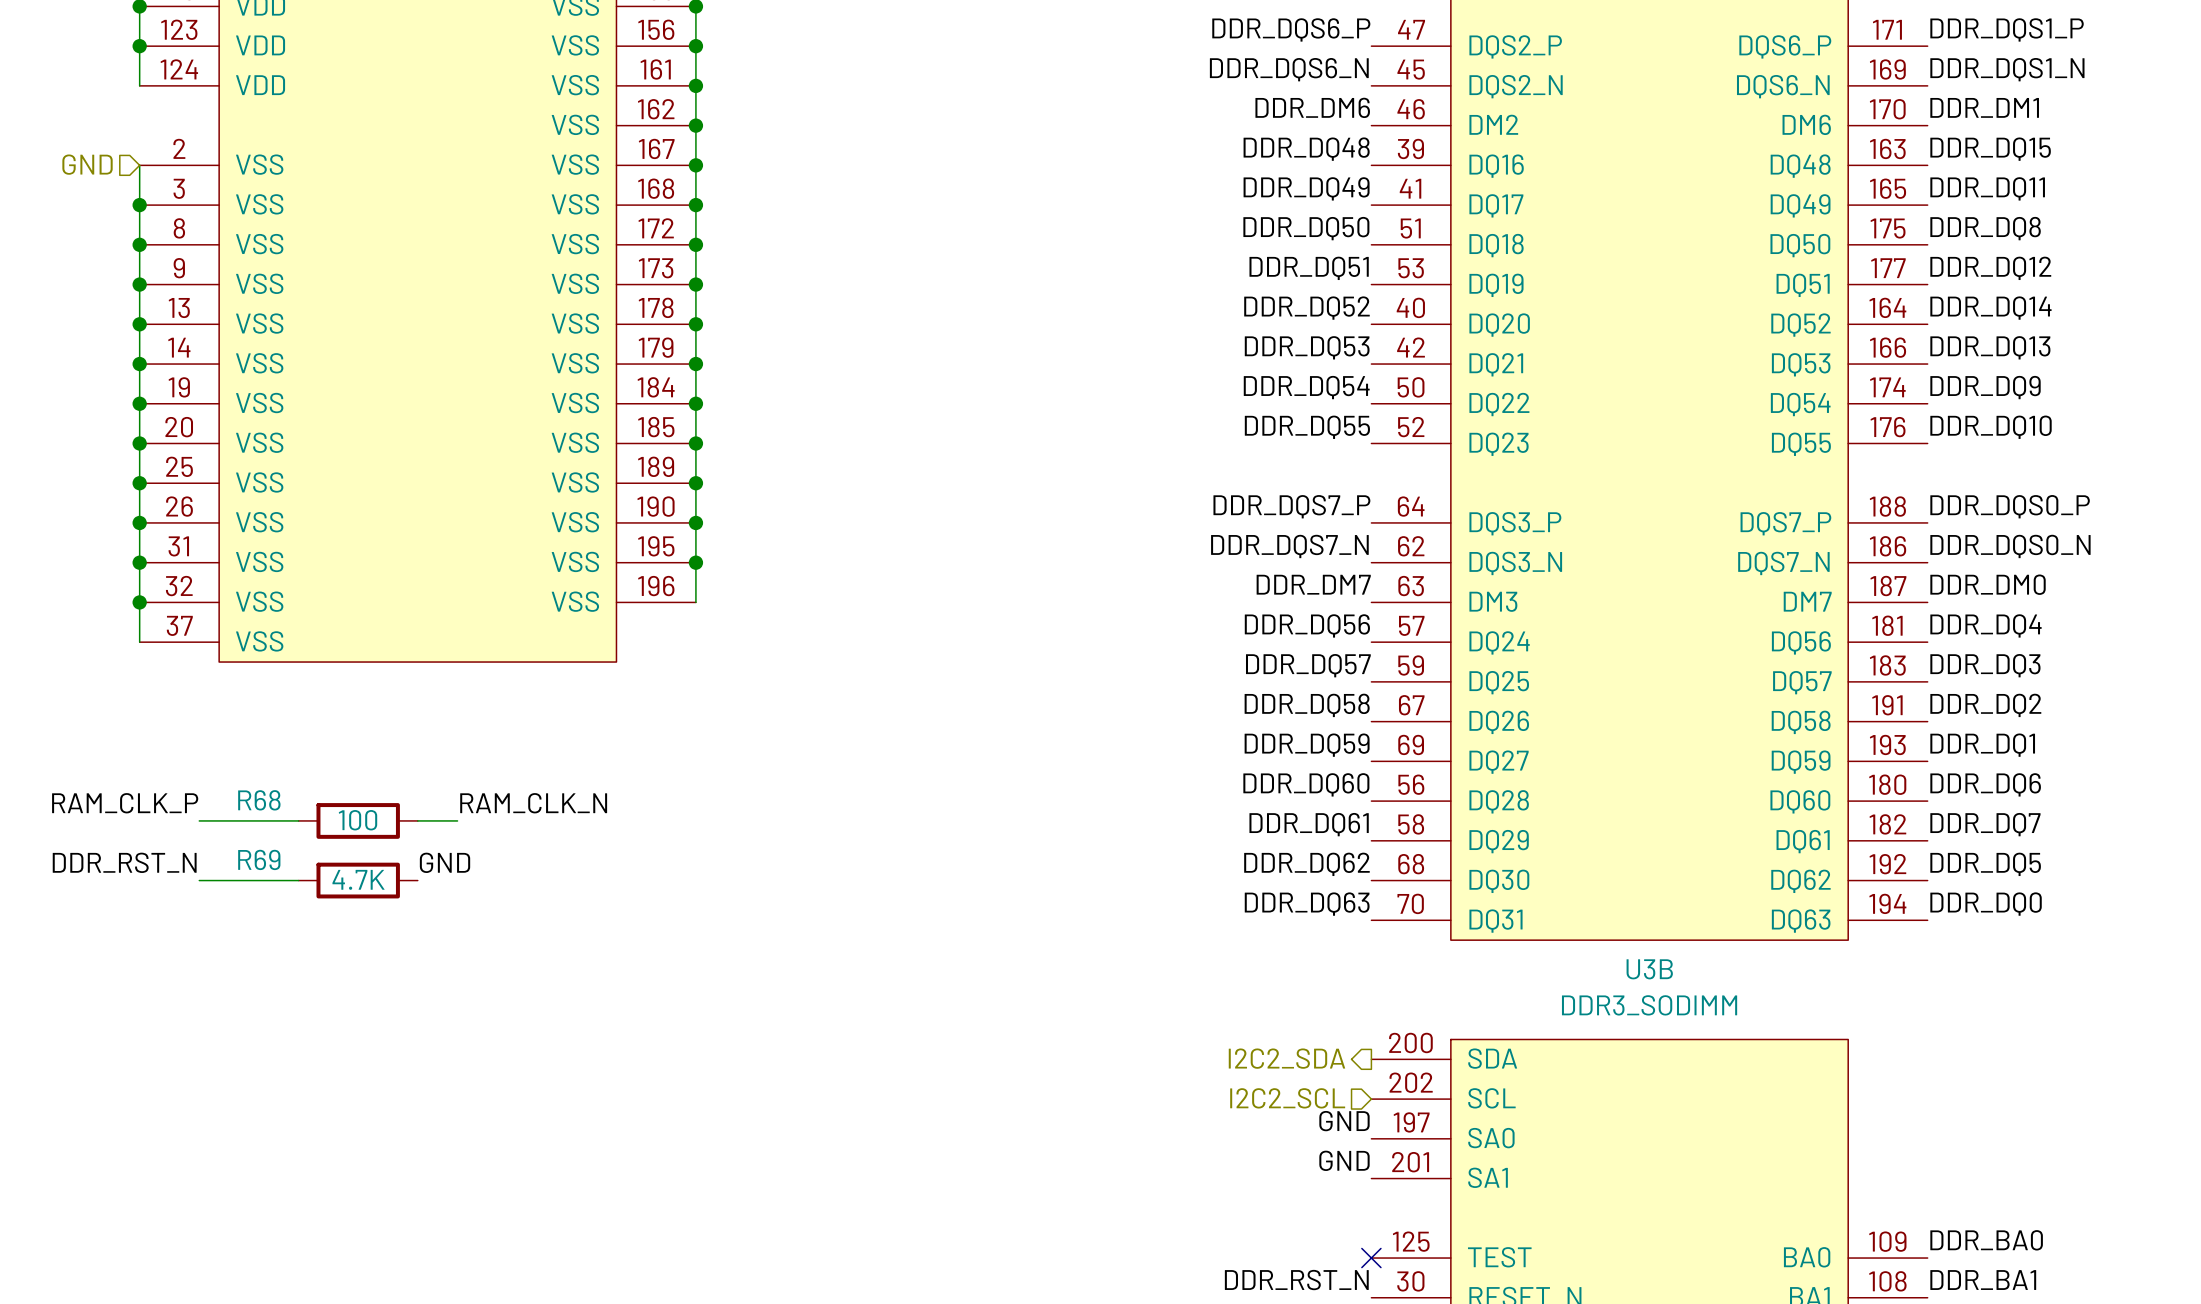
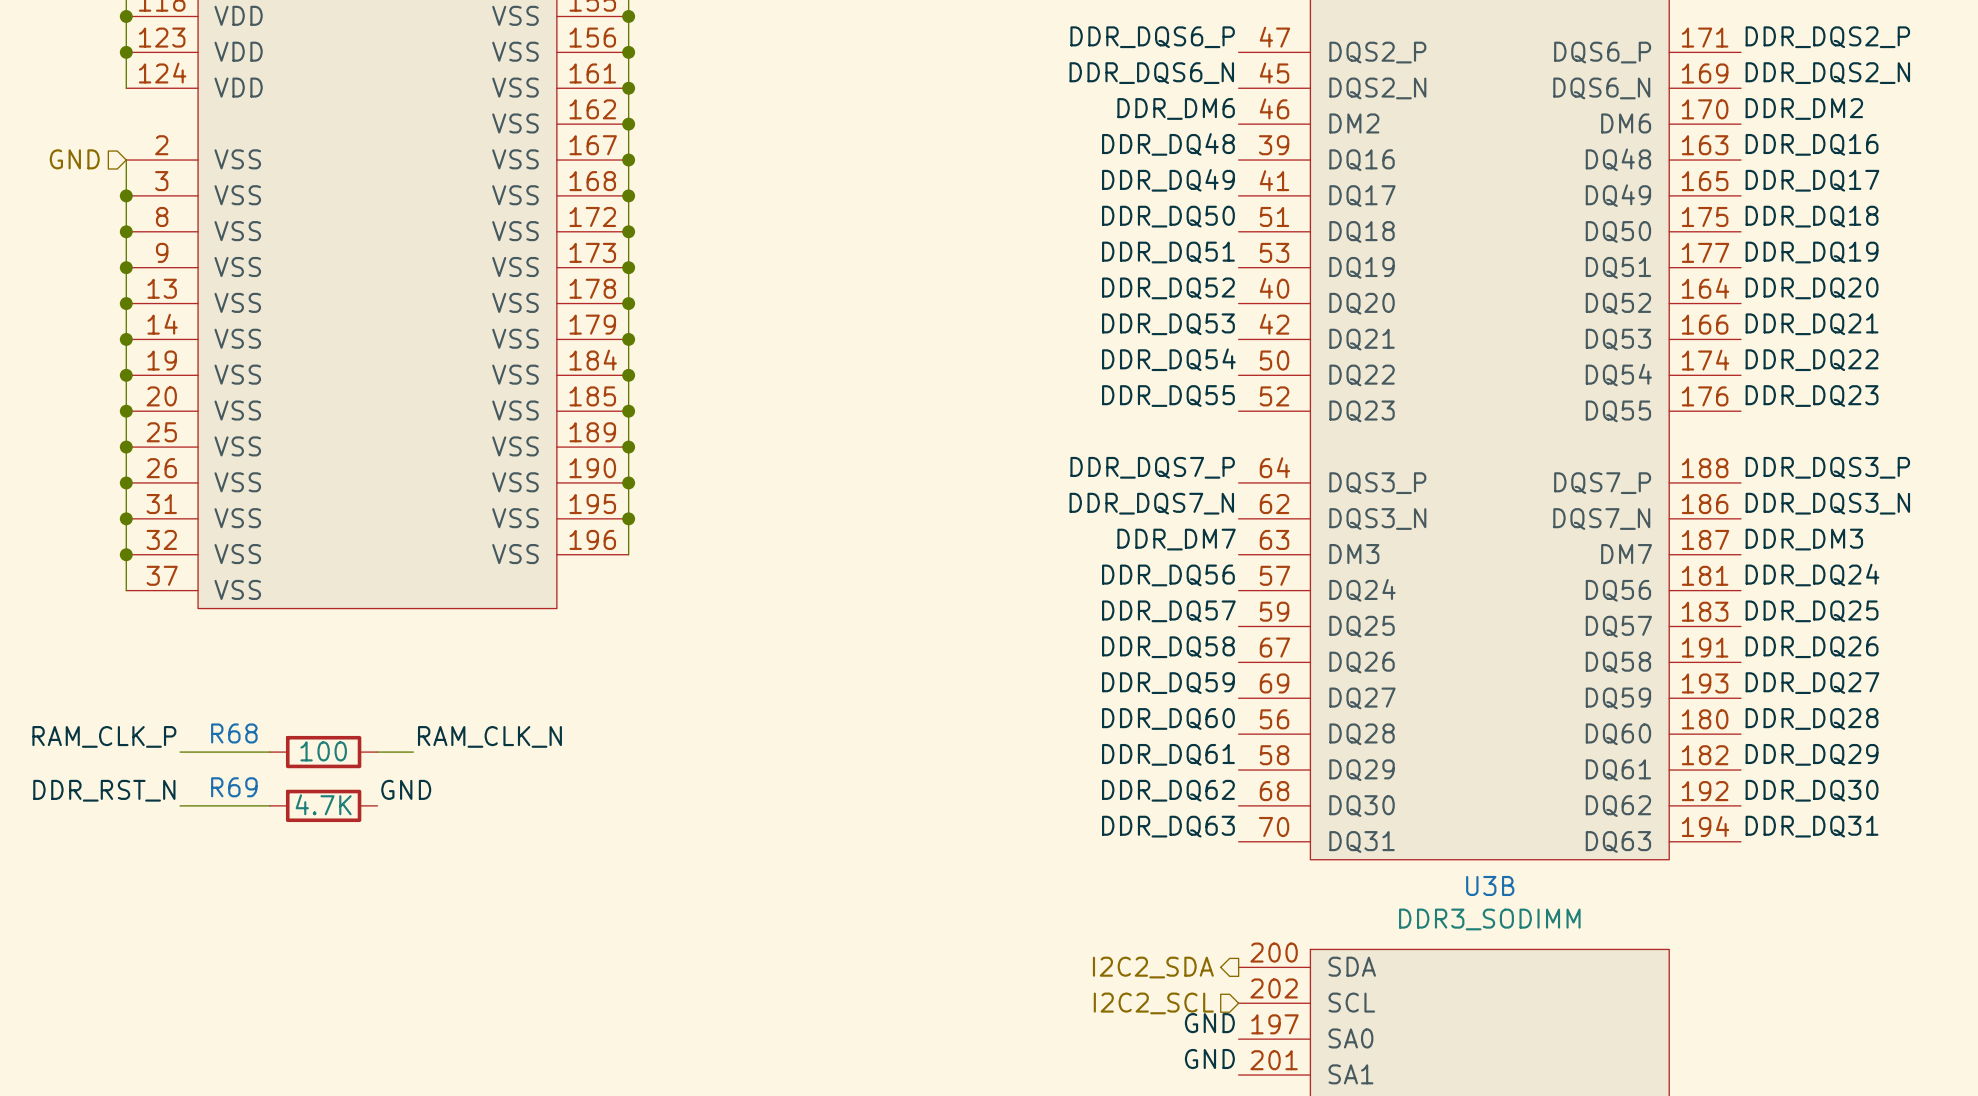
label: DDR_DQS1_P (2007, 29) -> DDR_DQS2_P (1827, 37)
label: DDR_DQS1_N (2007, 69) -> DDR_DQS2_N (1827, 73)
label: DDR_DM1 (1984, 107) -> DDR_DM2 (1804, 108)
label: DDR_DQ15 (1990, 149) -> DDR_DQ16 (1812, 144)
label: DDR_DQ11 (1987, 188) -> DDR_DQ17 (1812, 180)
label: DDR_DQ8 (1985, 228) -> DDR_DQ18 (1812, 216)
label: DDR_DQ12 (1990, 268) -> DDR_DQ19 (1812, 252)
label: DDR_DQ14 (1990, 308) -> DDR_DQ20 (1812, 288)
label: DDR_DQ13 (1990, 347) -> DDR_DQ21 (1812, 324)
label: DDR_DQ9 (1985, 387) -> DDR_DQ22 (1812, 360)
label: DDR_DQ10 (1991, 427) -> DDR_DQ23 (1812, 396)
label: DDR_DQS0_P (2010, 506) -> DDR_DQS3_P (1827, 467)
label: DDR_DQS0_N (2010, 546) -> DDR_DQS3_N (1827, 503)
label: DDR_DM0 (1988, 584) -> DDR_DM3 (1804, 539)
label: DDR_DQ4 (1985, 625) -> DDR_DQ24 (1812, 575)
label: DDR_DQ3 (1985, 665) -> DDR_DQ25 (1812, 611)
label: DDR_DQ2 (1985, 705) -> DDR_DQ26 (1812, 647)
label: DDR_DQ1 (1982, 745) -> DDR_DQ27 (1812, 683)
label: DDR_DQ6 (1985, 784) -> DDR_DQ28 (1812, 718)
label: DDR_DQ7 (1985, 824) -> DDR_DQ29 (1812, 754)
label: DDR_DQ5 (1985, 864) -> DDR_DQ30 (1812, 790)
label: DDR_DQ0 (1986, 904) -> DDR_DQ31 (1812, 826)

